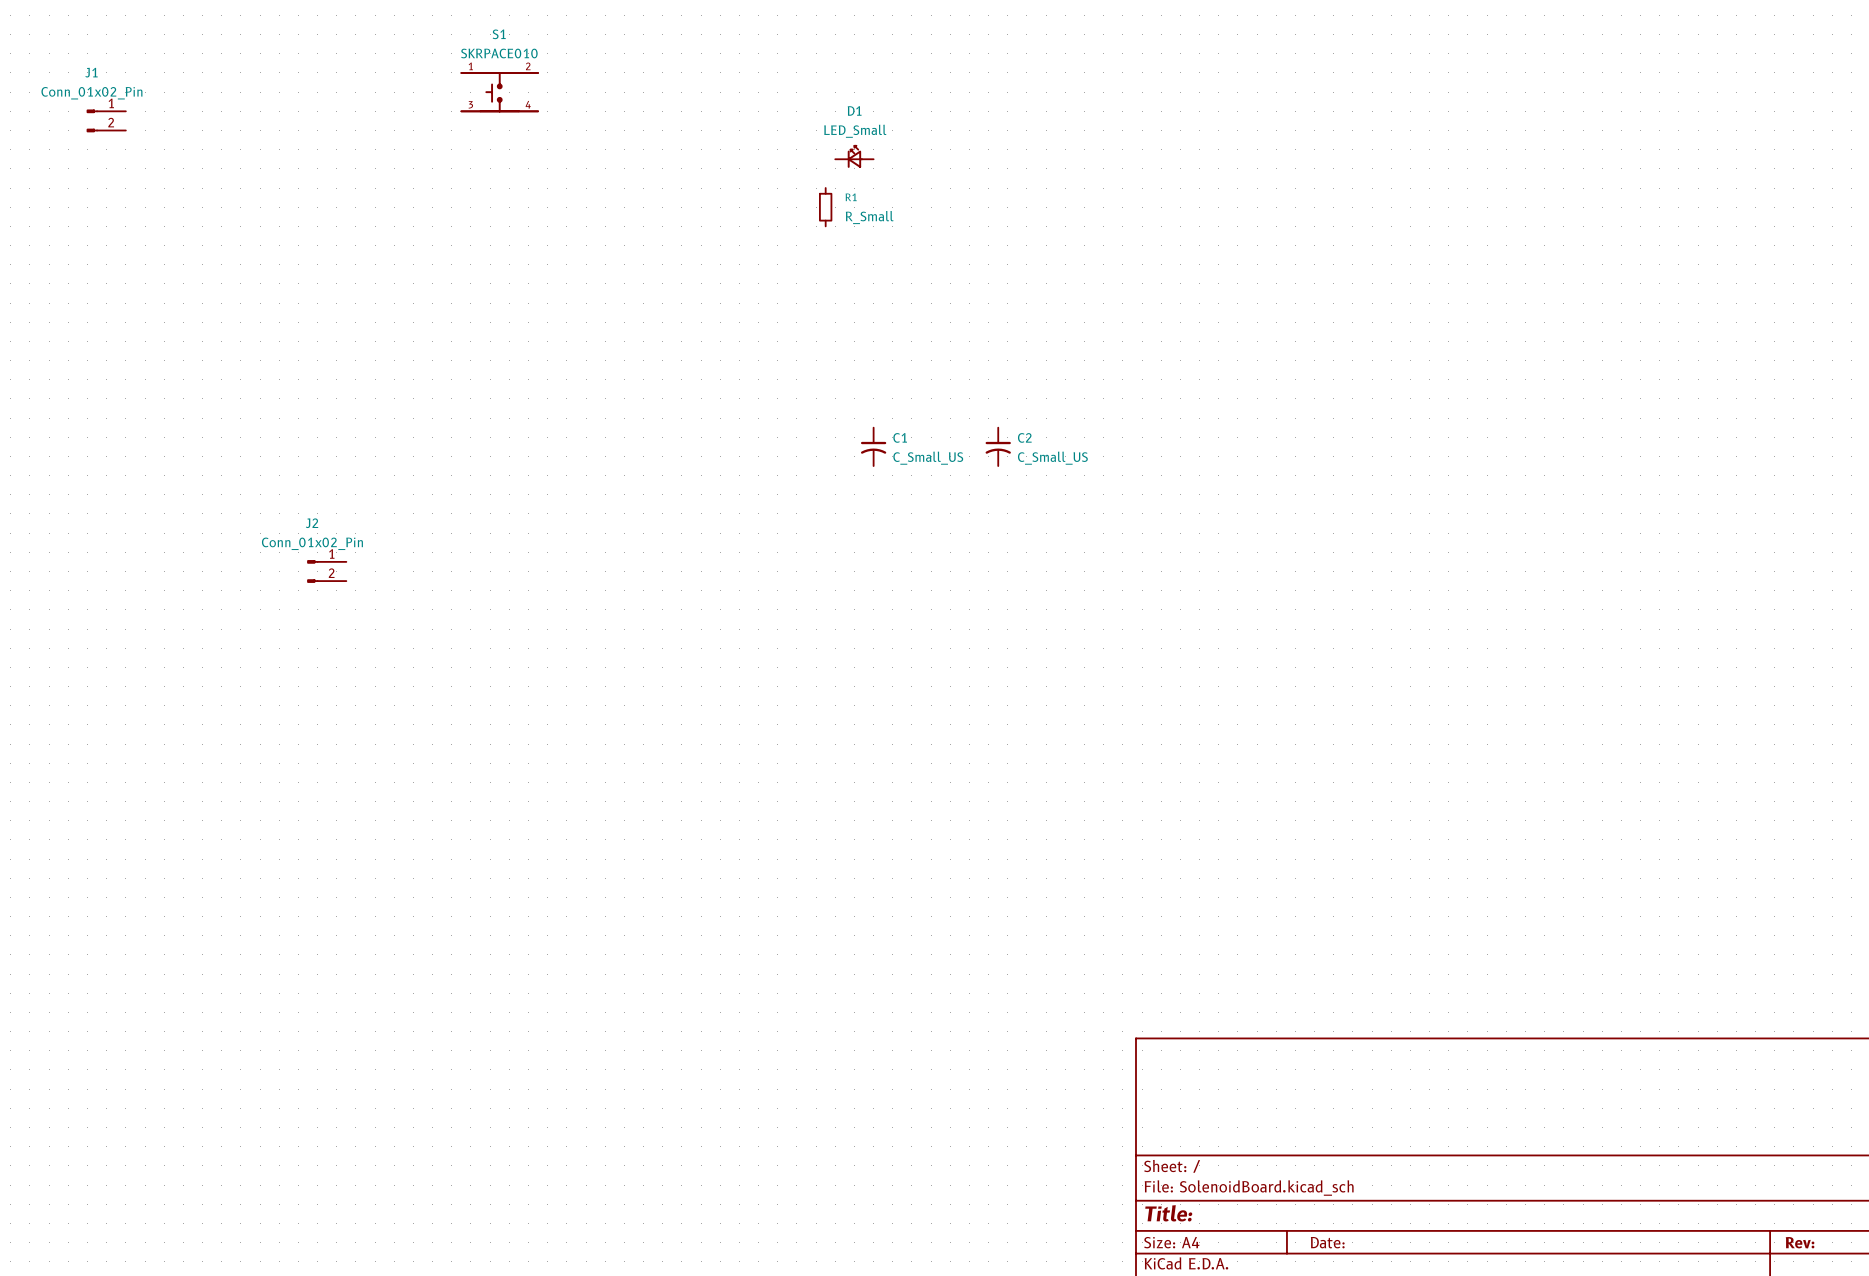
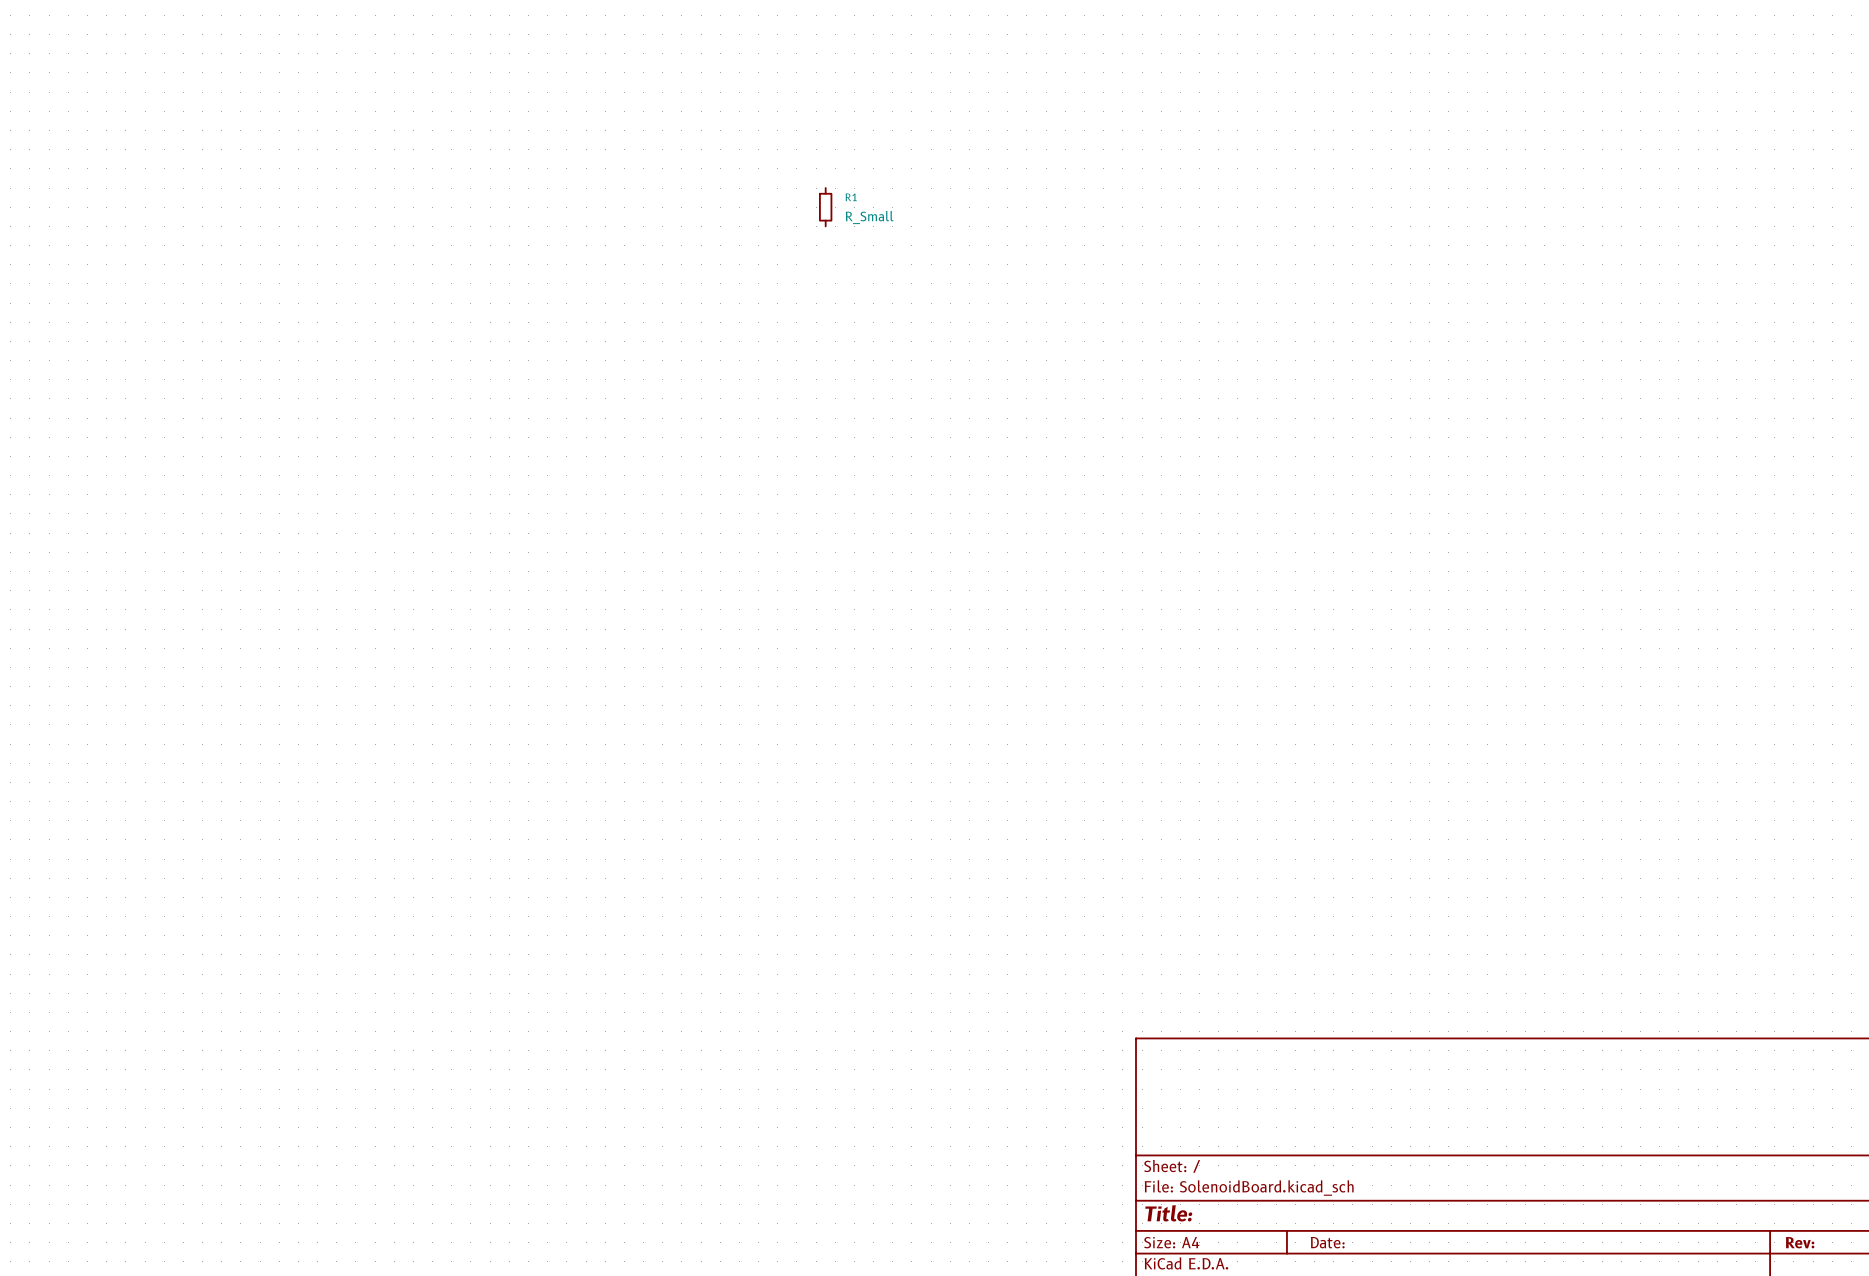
S1: SKRPACE010 (499, 92) -> none
J1: Conn_01x02_Pin (106, 120) -> none
D1: LED_Small (854, 156) -> none
C1: C_Small_US (873, 446) -> none
C2: C_Small_US (998, 446) -> none
J2: Conn_01x02_Pin (326, 571) -> none

